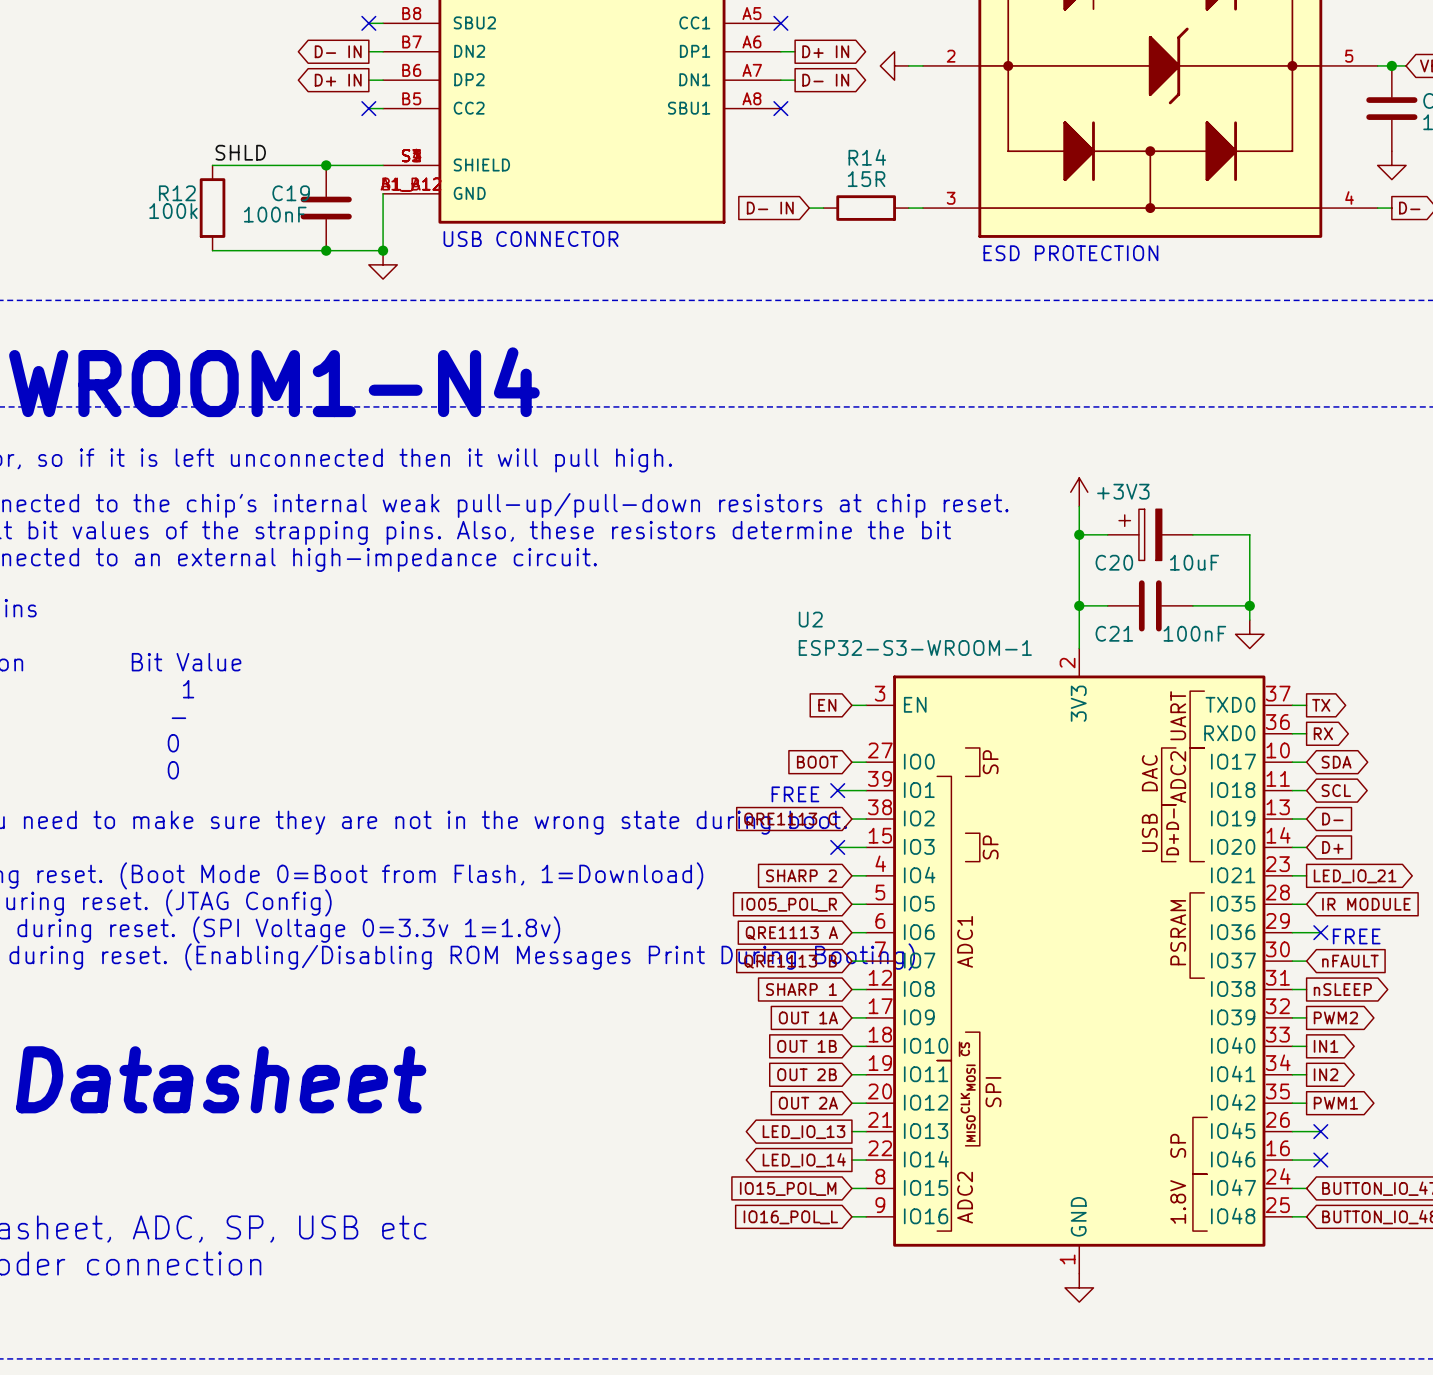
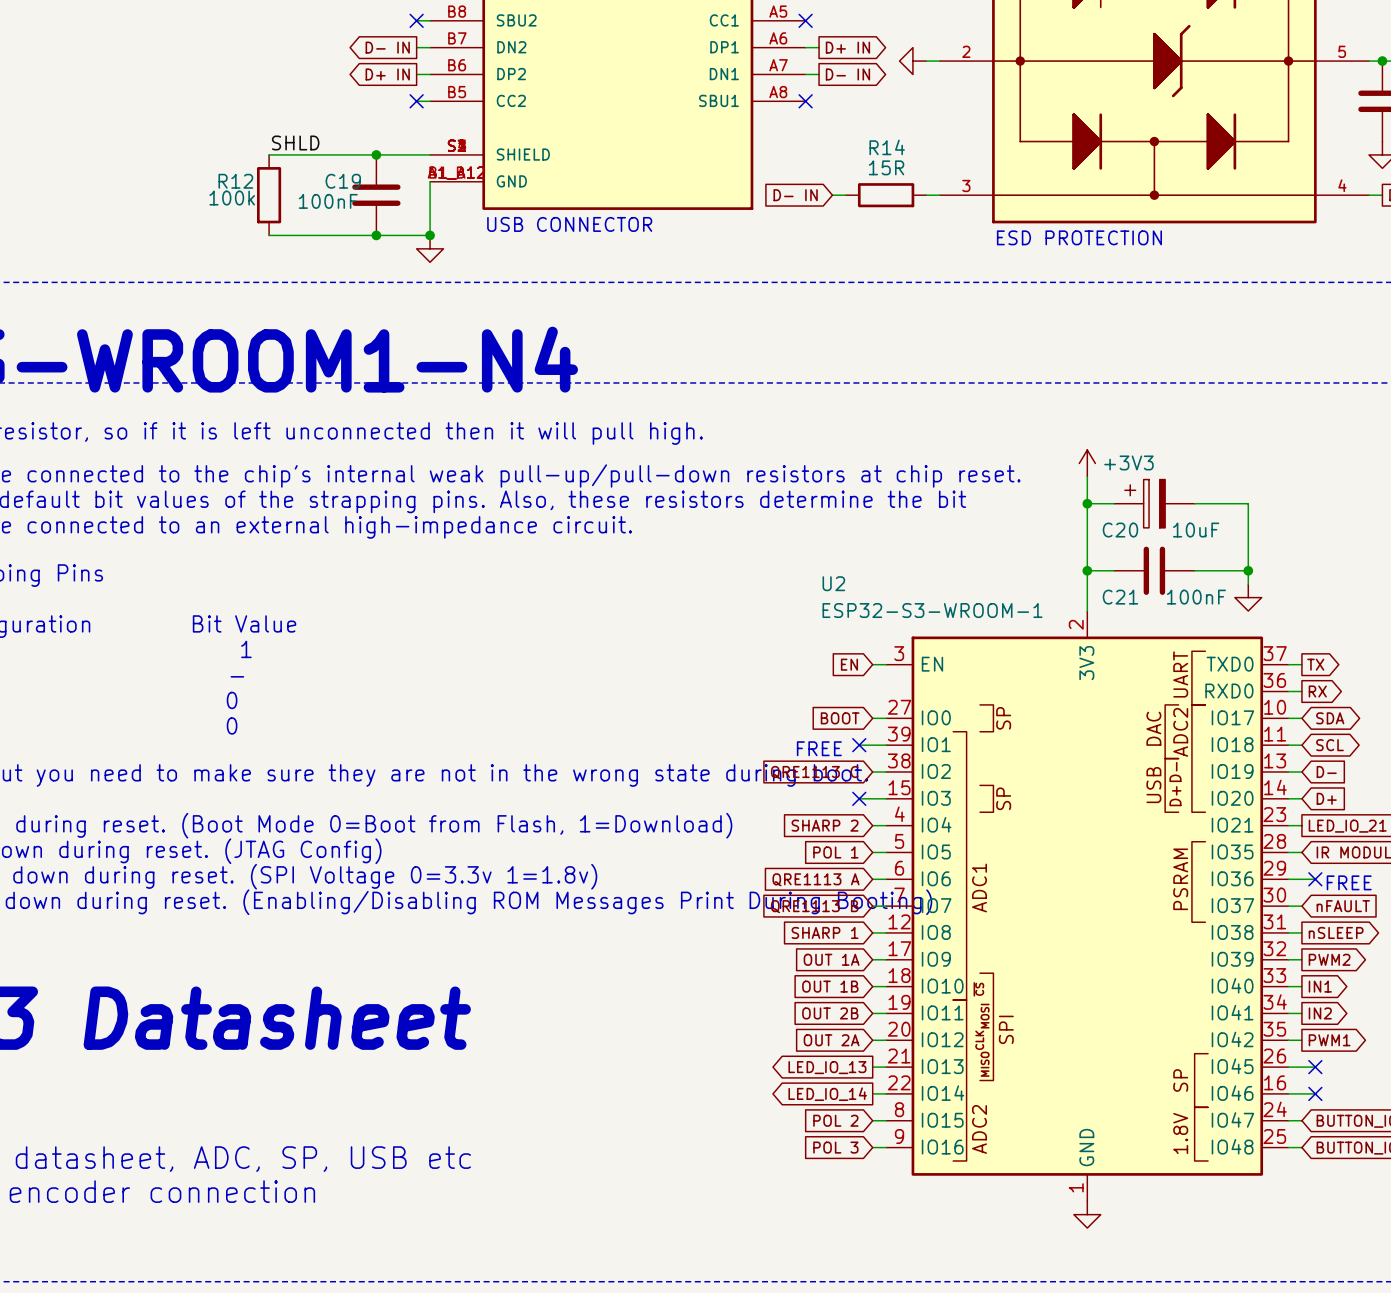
global label: IO05_POL_R (789, 904) -> POL 1 (835, 852)
global label: IO15_POL_M (788, 1188) -> POL 2 (835, 1120)
global label: IO16_POL_L (790, 1217) -> POL 3 (835, 1147)

